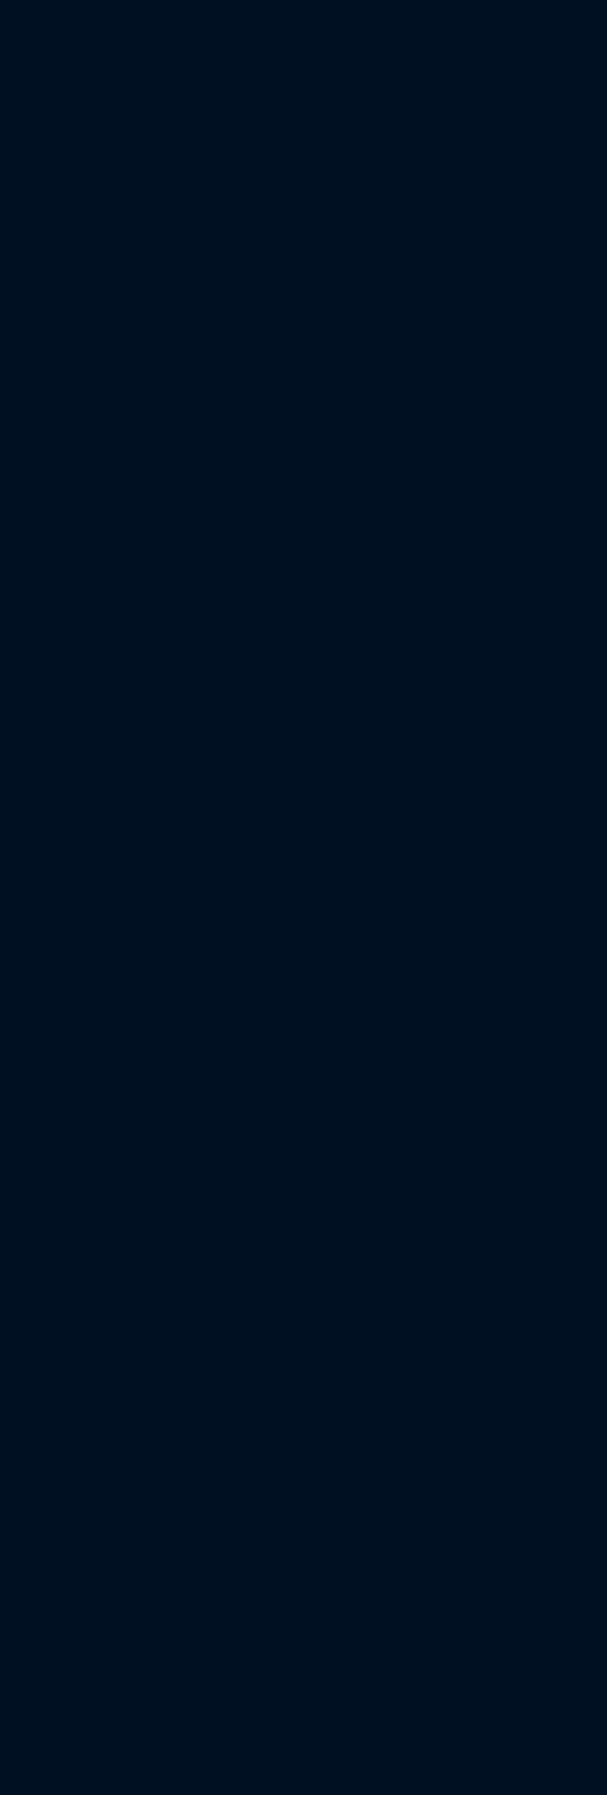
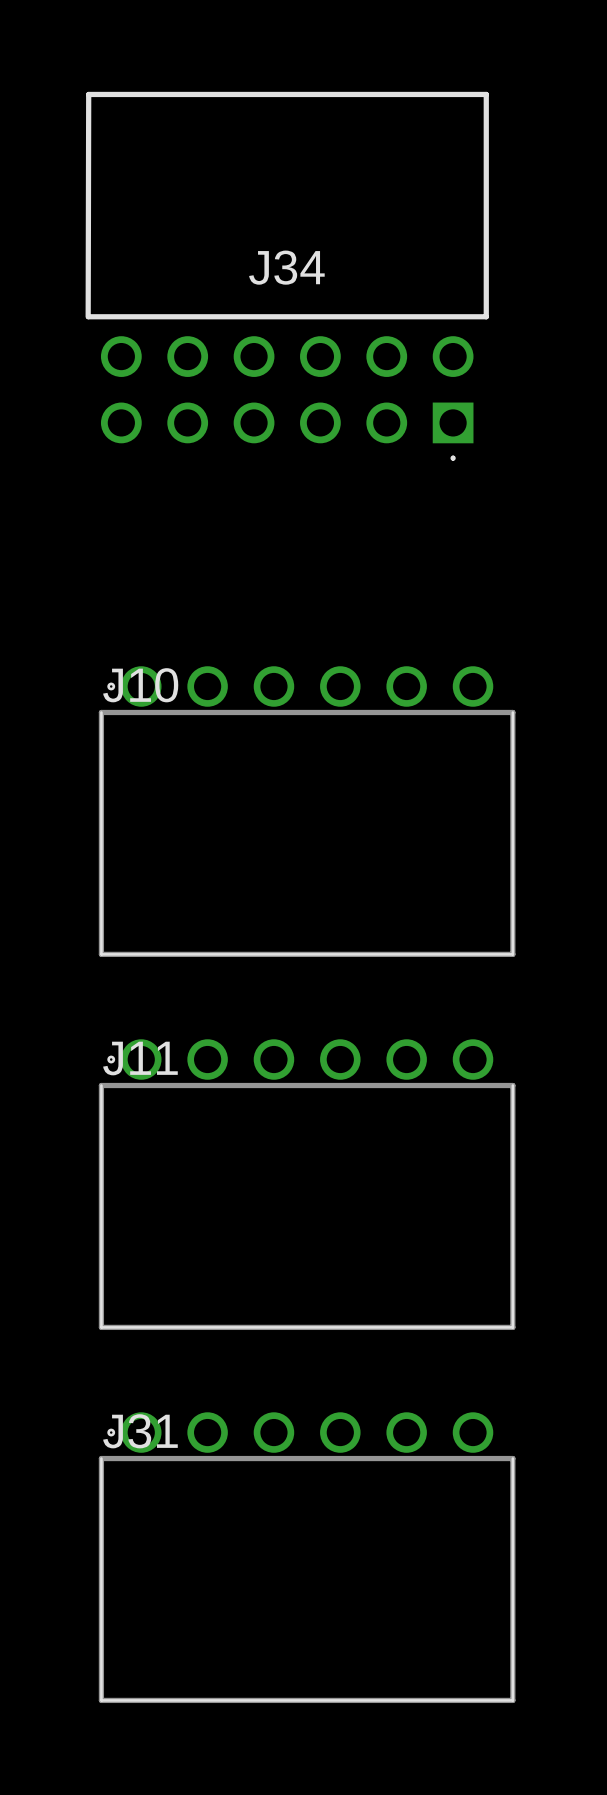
J34: none -> (287, 276)
J10: none -> (307, 811)
J11: none -> (307, 1184)
J31: none -> (307, 1557)

